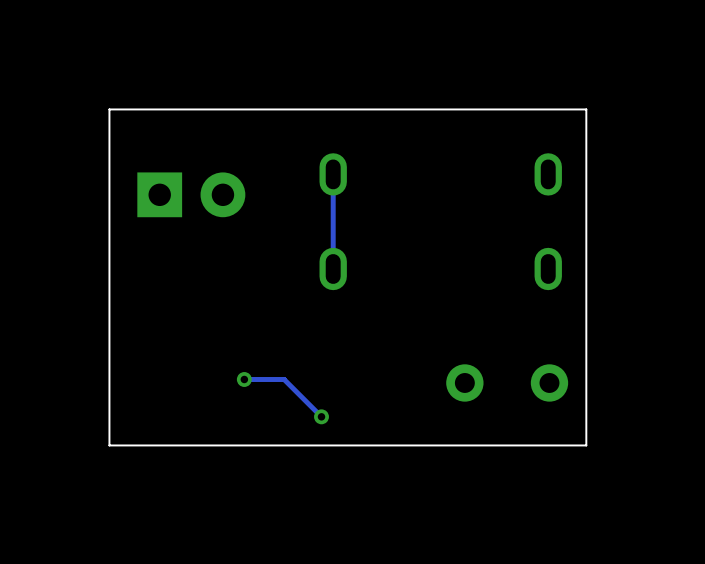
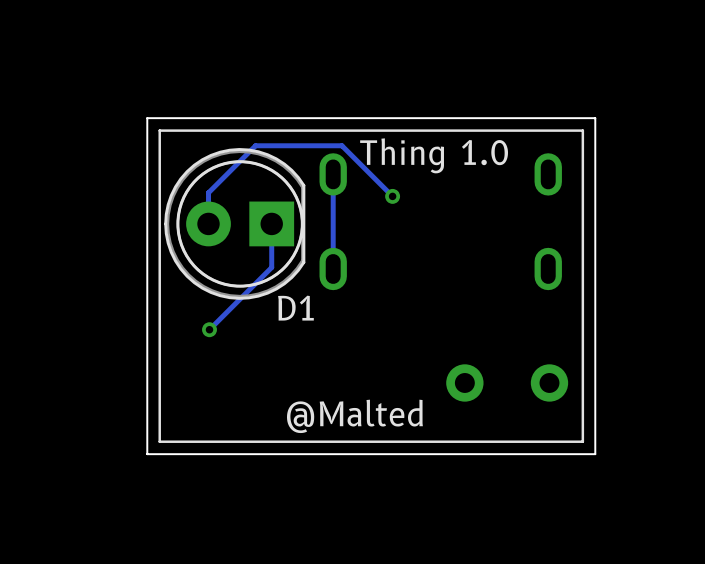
board edge: (586, 109) (109, 109) (109, 445) (586, 445) (586, 109) -> (595, 118) (595, 454) (147, 454) (147, 118) (595, 118)
line: none -> (582, 130) (159, 130) (159, 441) (582, 441) (582, 130)
text: none -> Thing 1.0 (434, 155)
D1 side: top (191, 194) -> bottom (234, 223)
track: none -> (392, 196) (341, 145) (255, 145) (208, 192) (208, 223)
via: none -> (392, 196)
track: none -> (271, 223) (271, 267) (209, 329)
track: (244, 379) (284, 379) (321, 416) -> none
via position: (244, 379) -> (209, 329)
via: (321, 416) -> none
text: none -> @Malted (354, 416)

